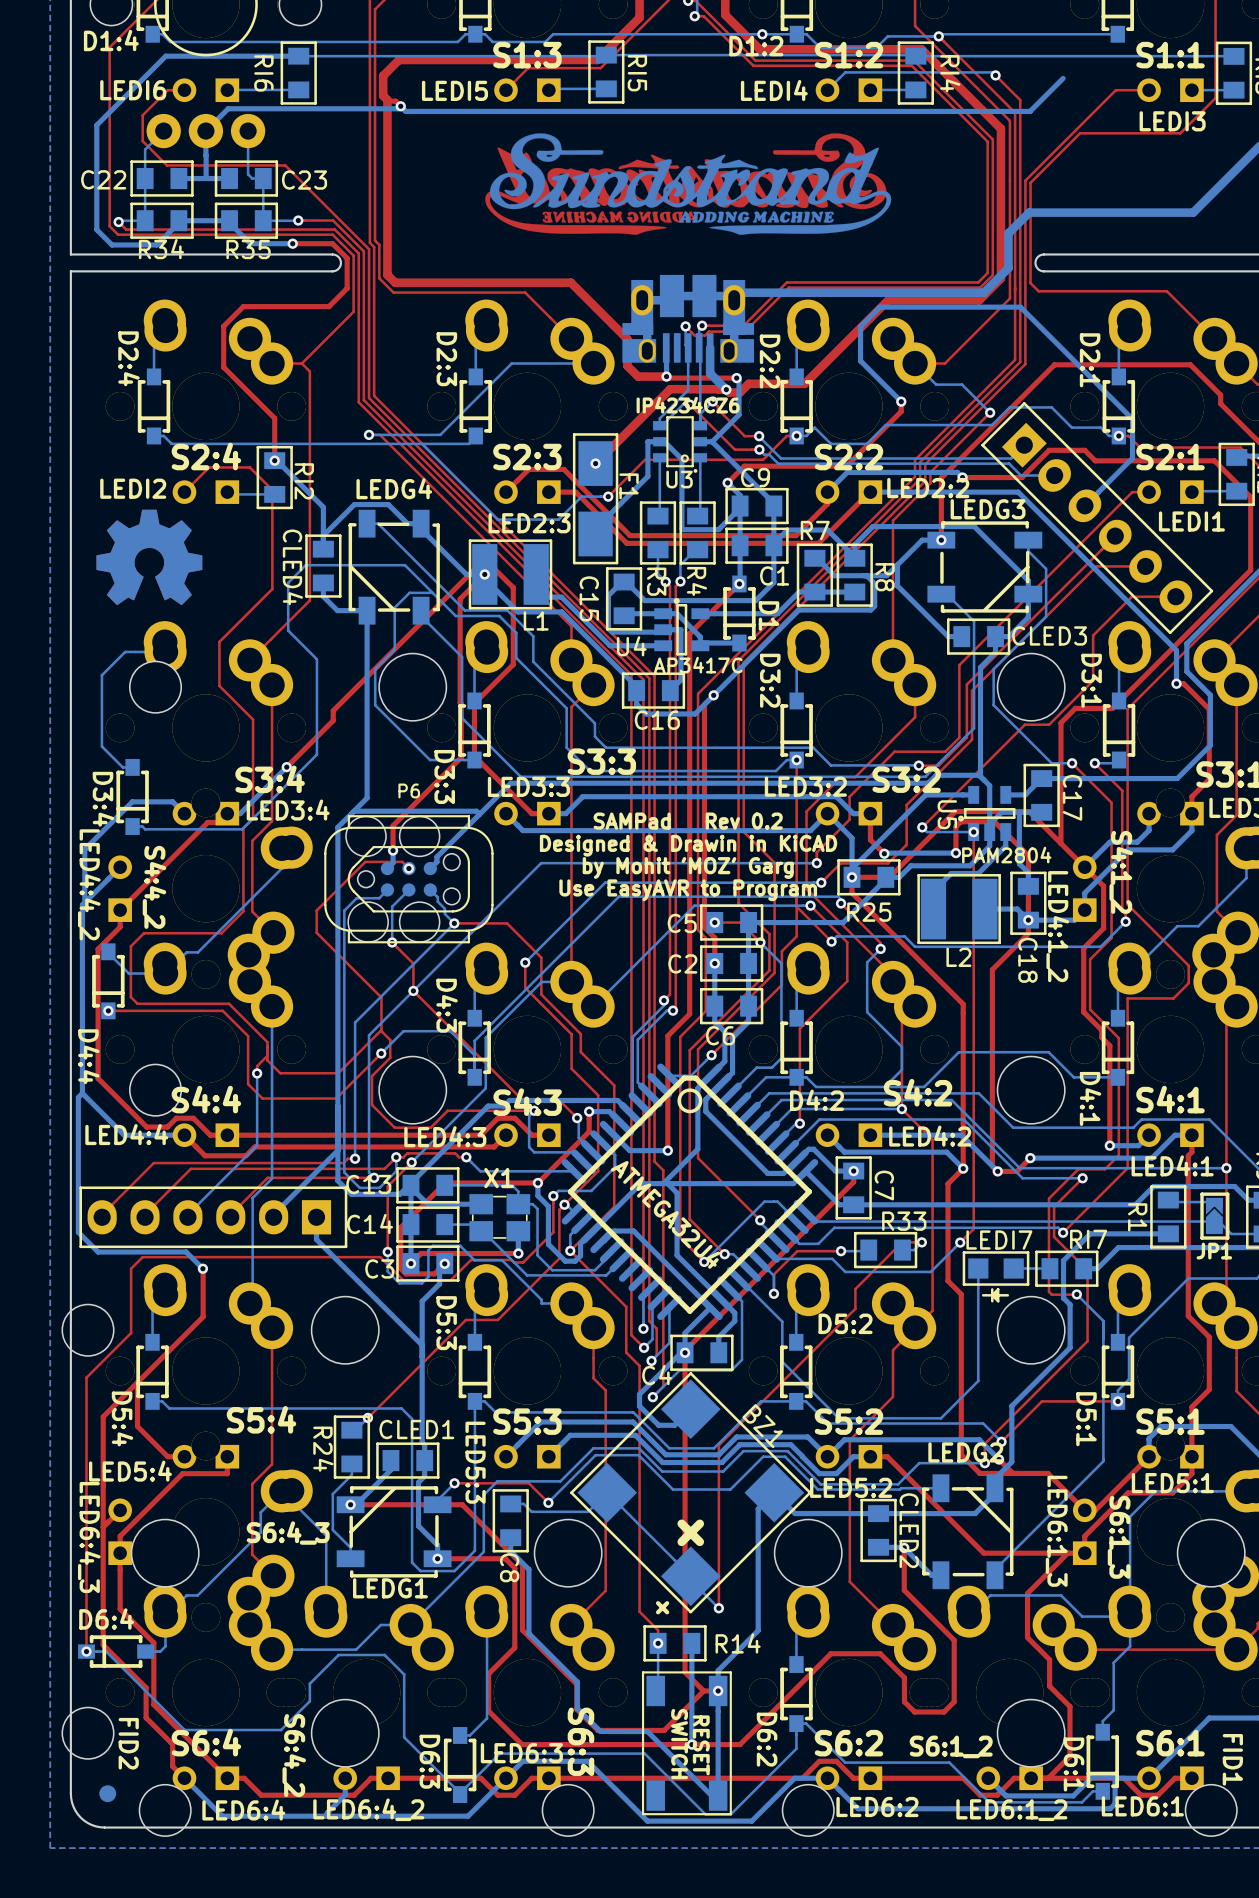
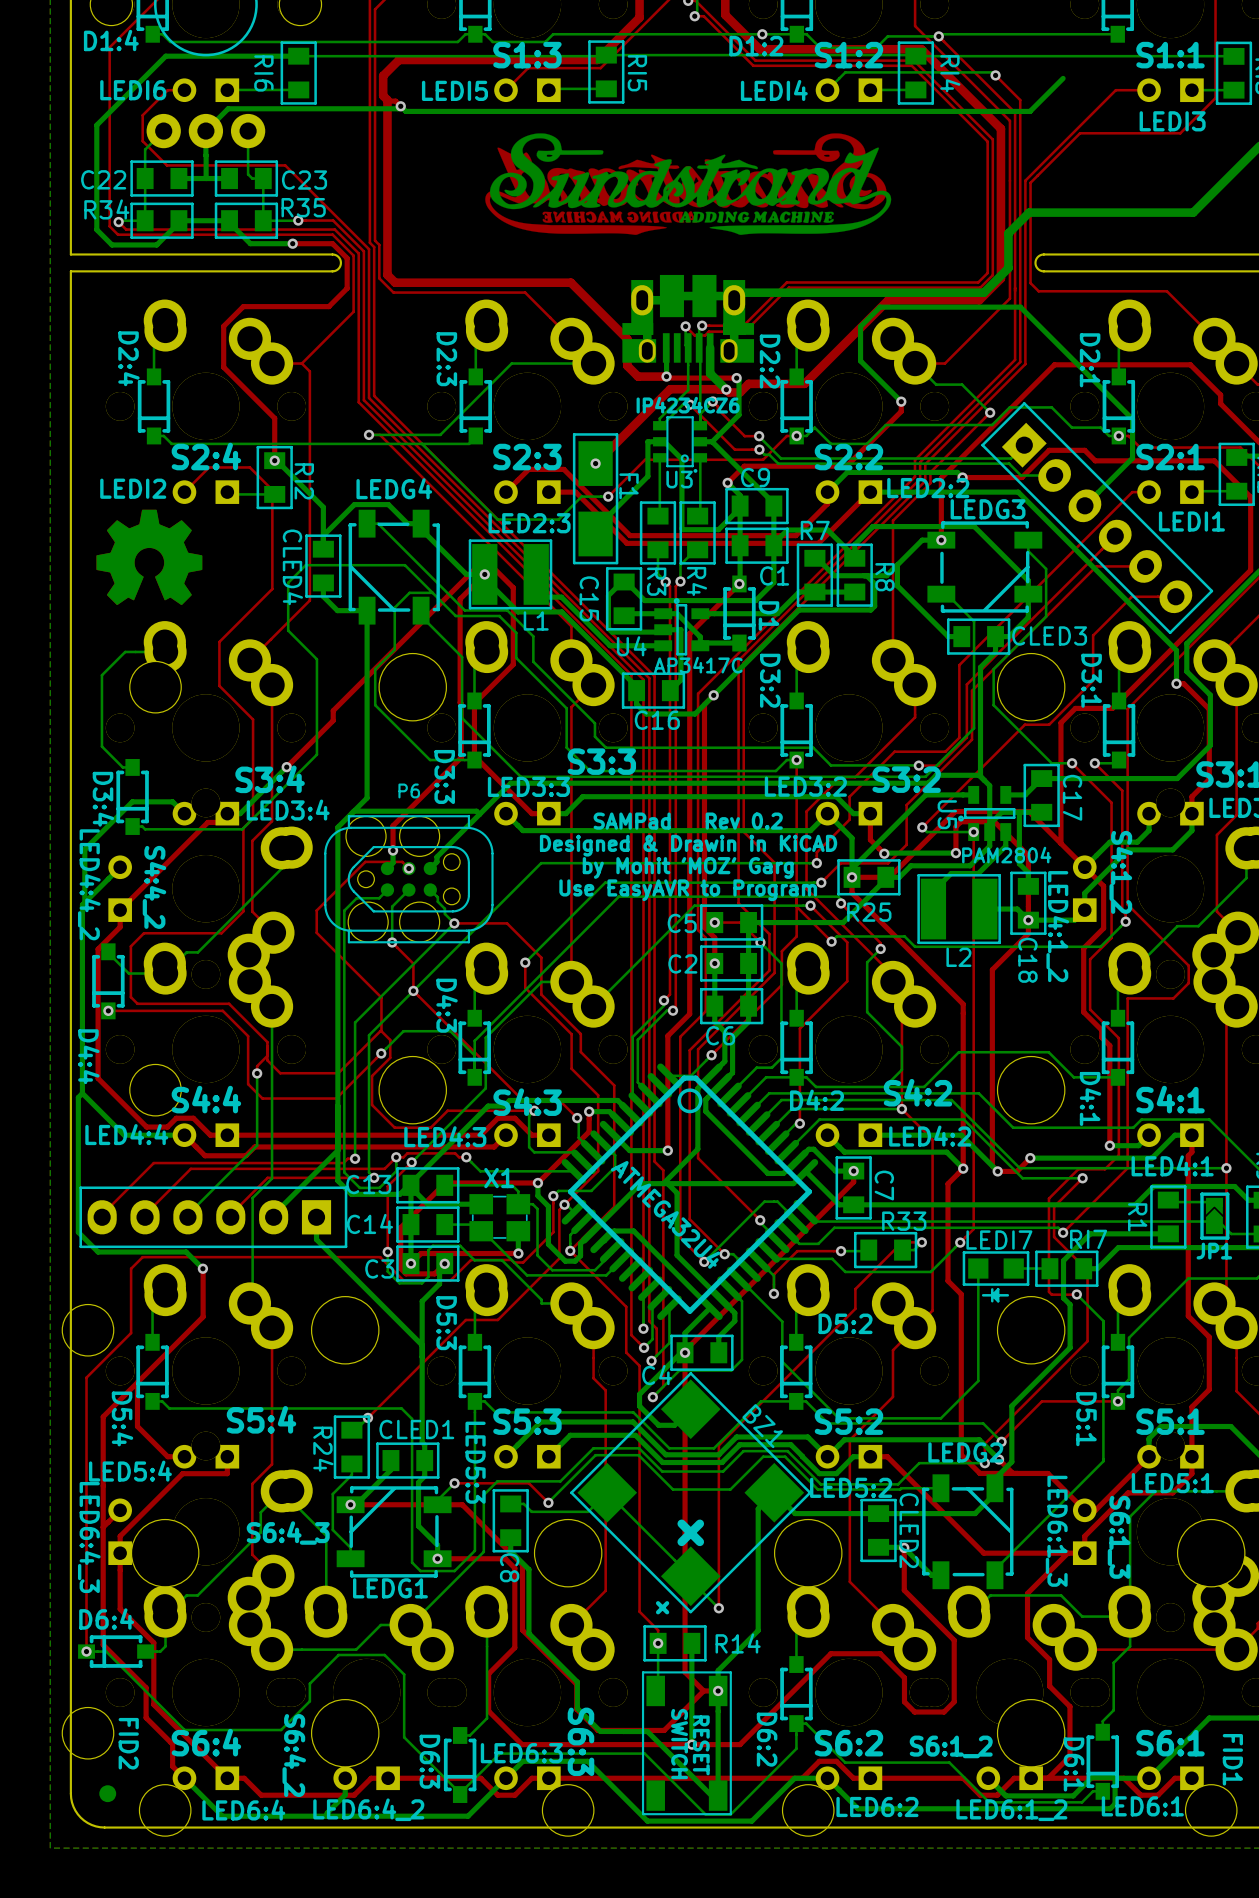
R34 name position: R34 (161, 249) -> R34 (106, 209)
R35 name position: R35 (248, 249) -> R35 (303, 207)

